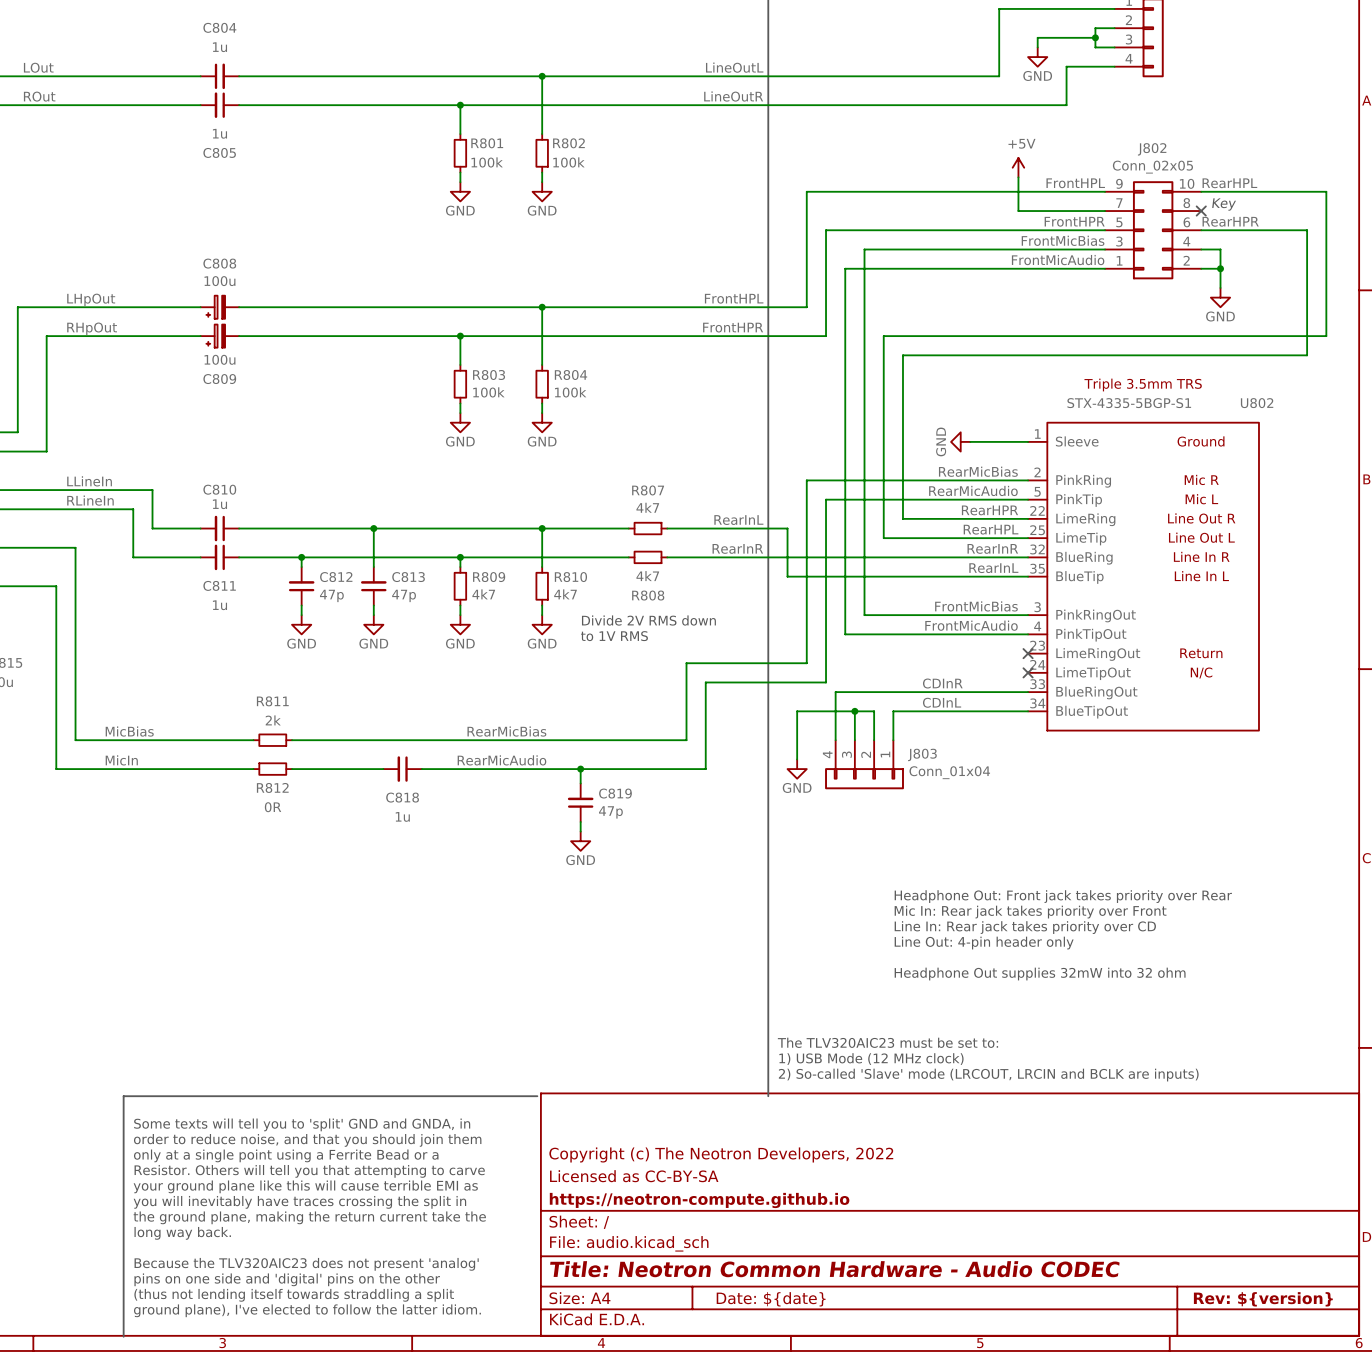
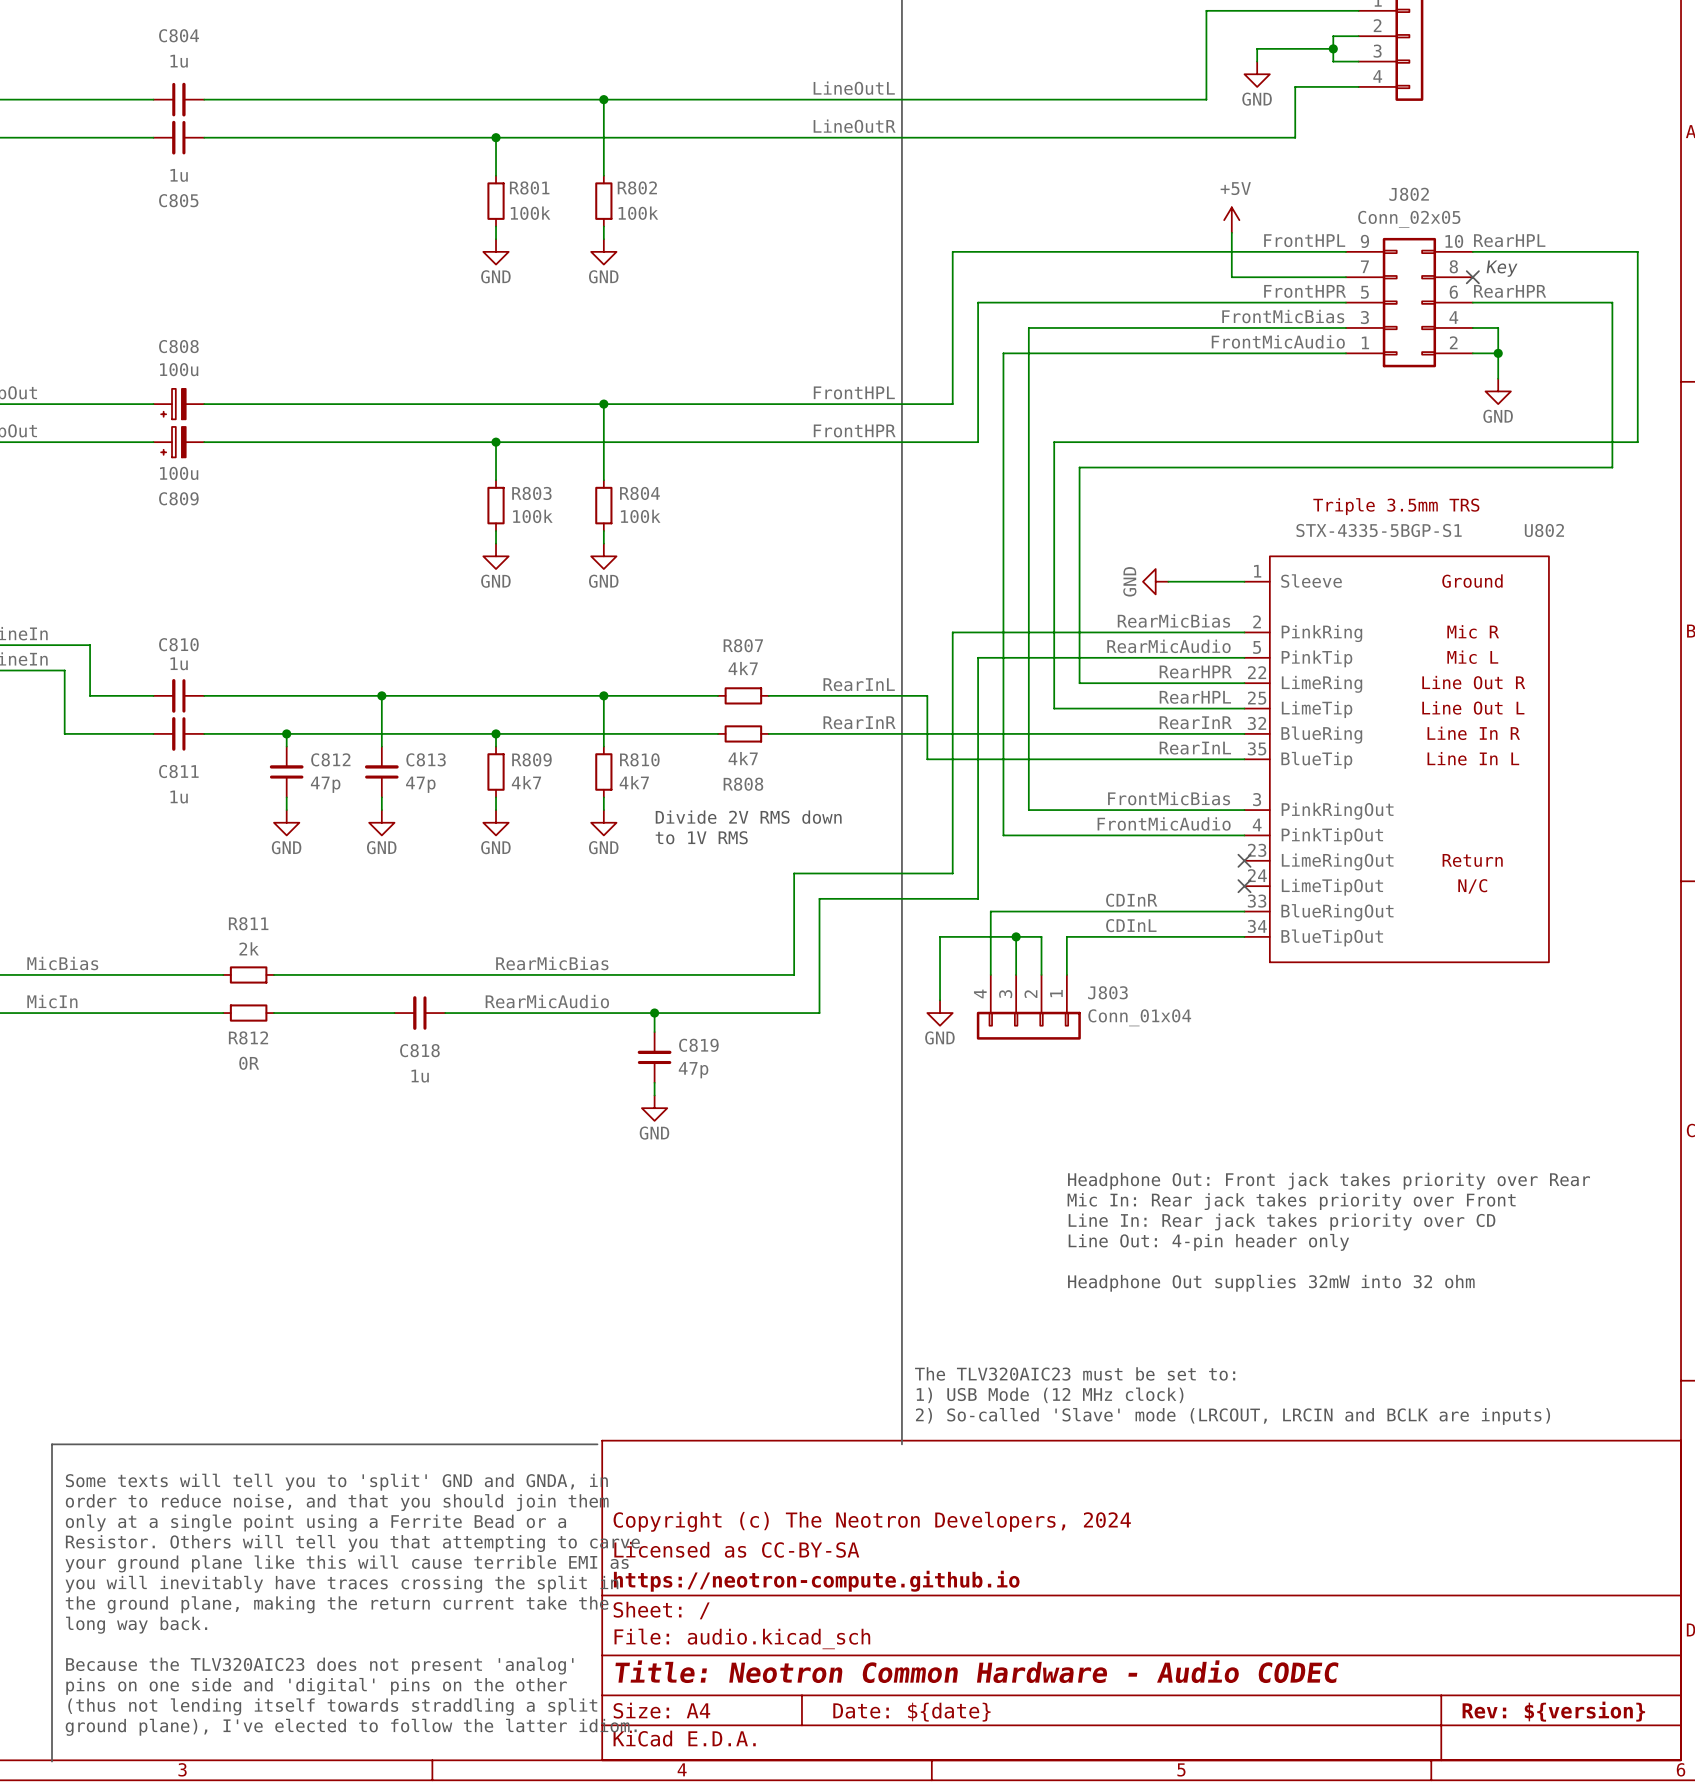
title block: Copyright (c) The Neotron Developers, 2022 (721, 1154) -> Copyright (c) The Neotron Developers, 2024 (872, 1521)

